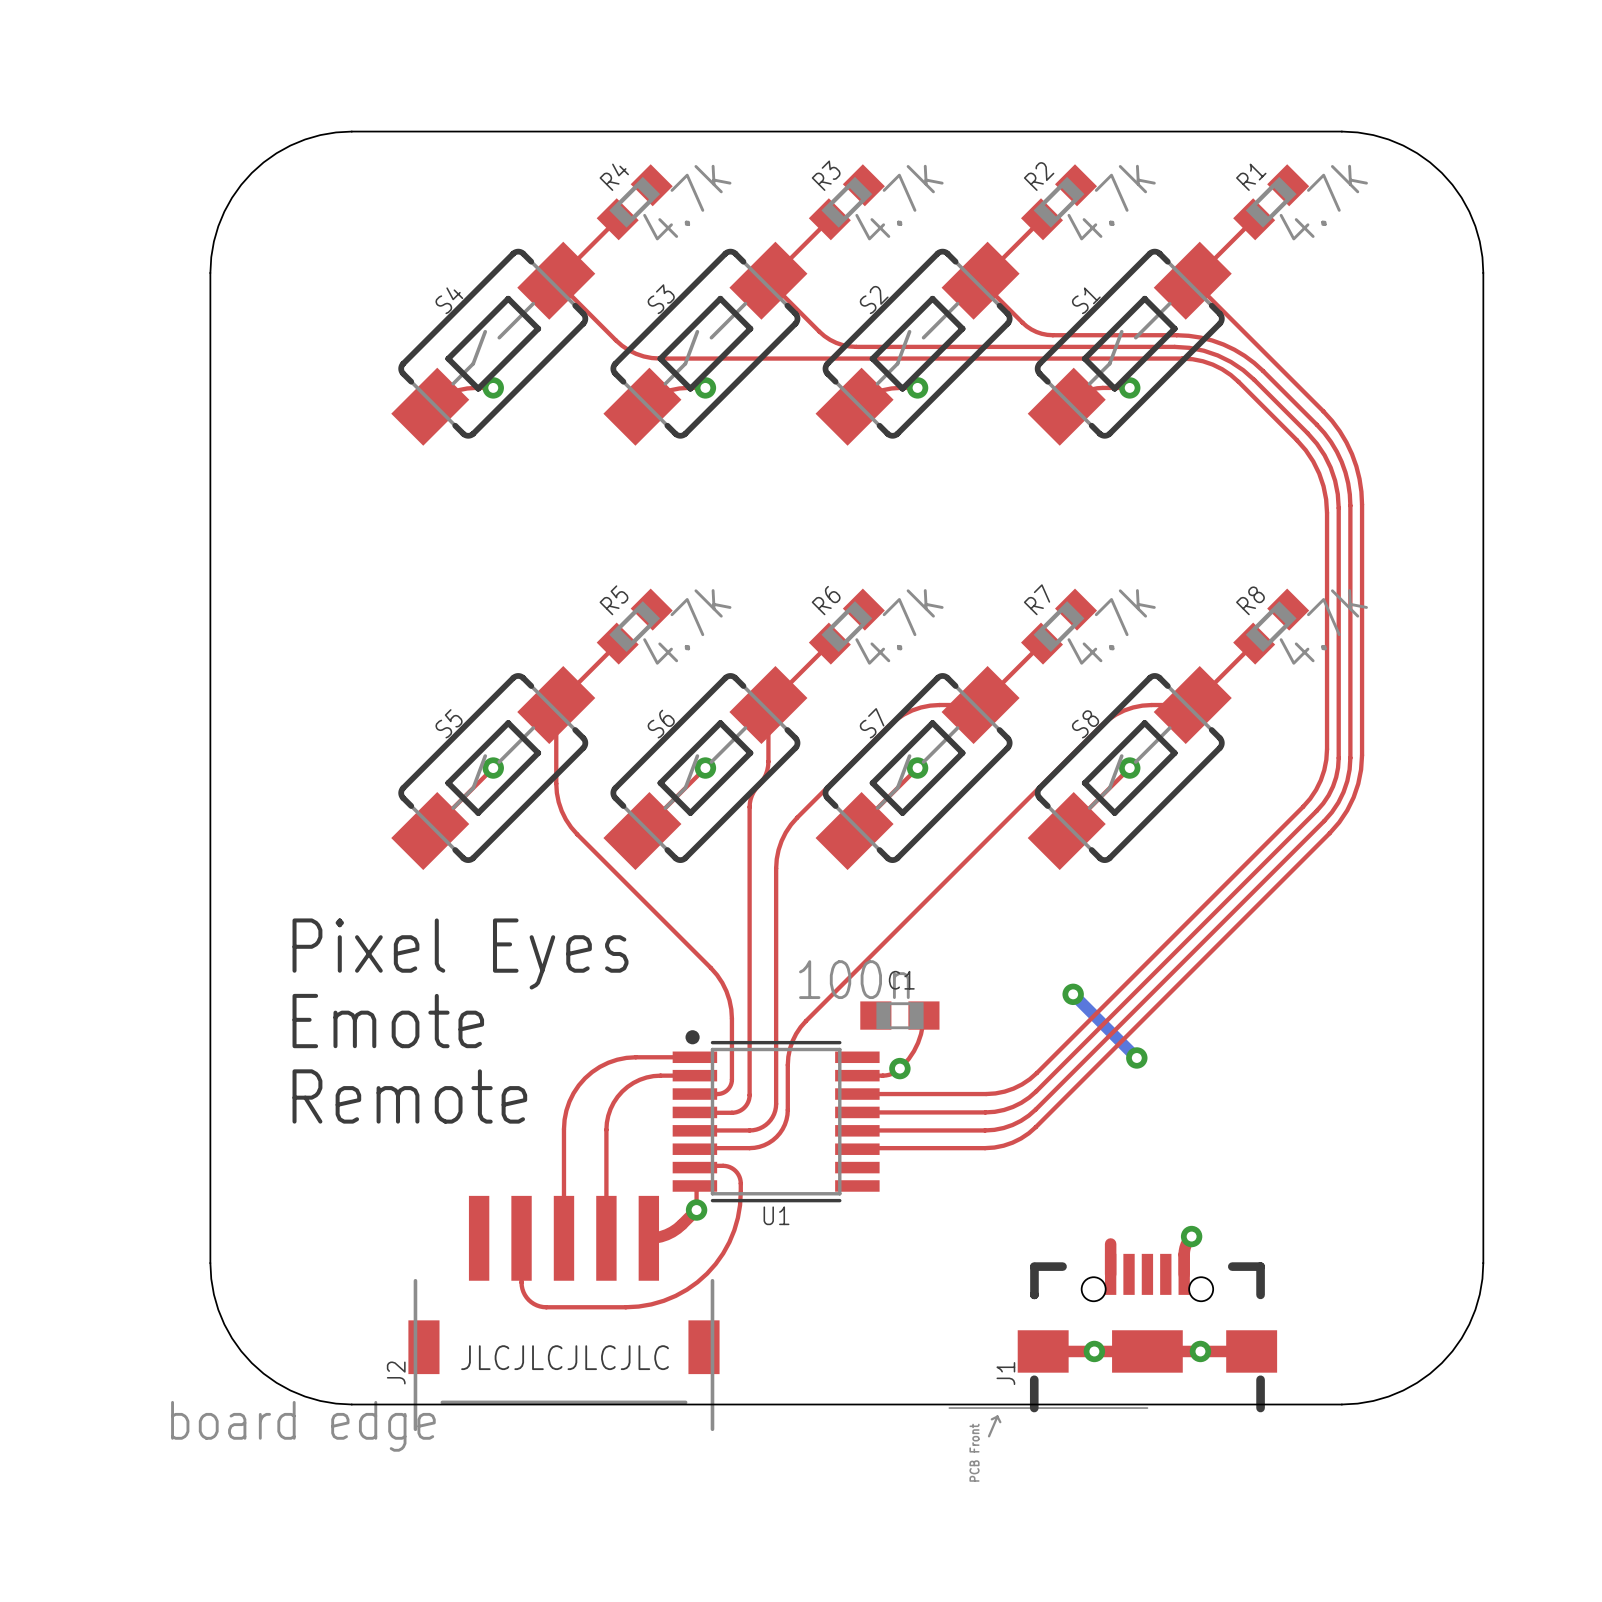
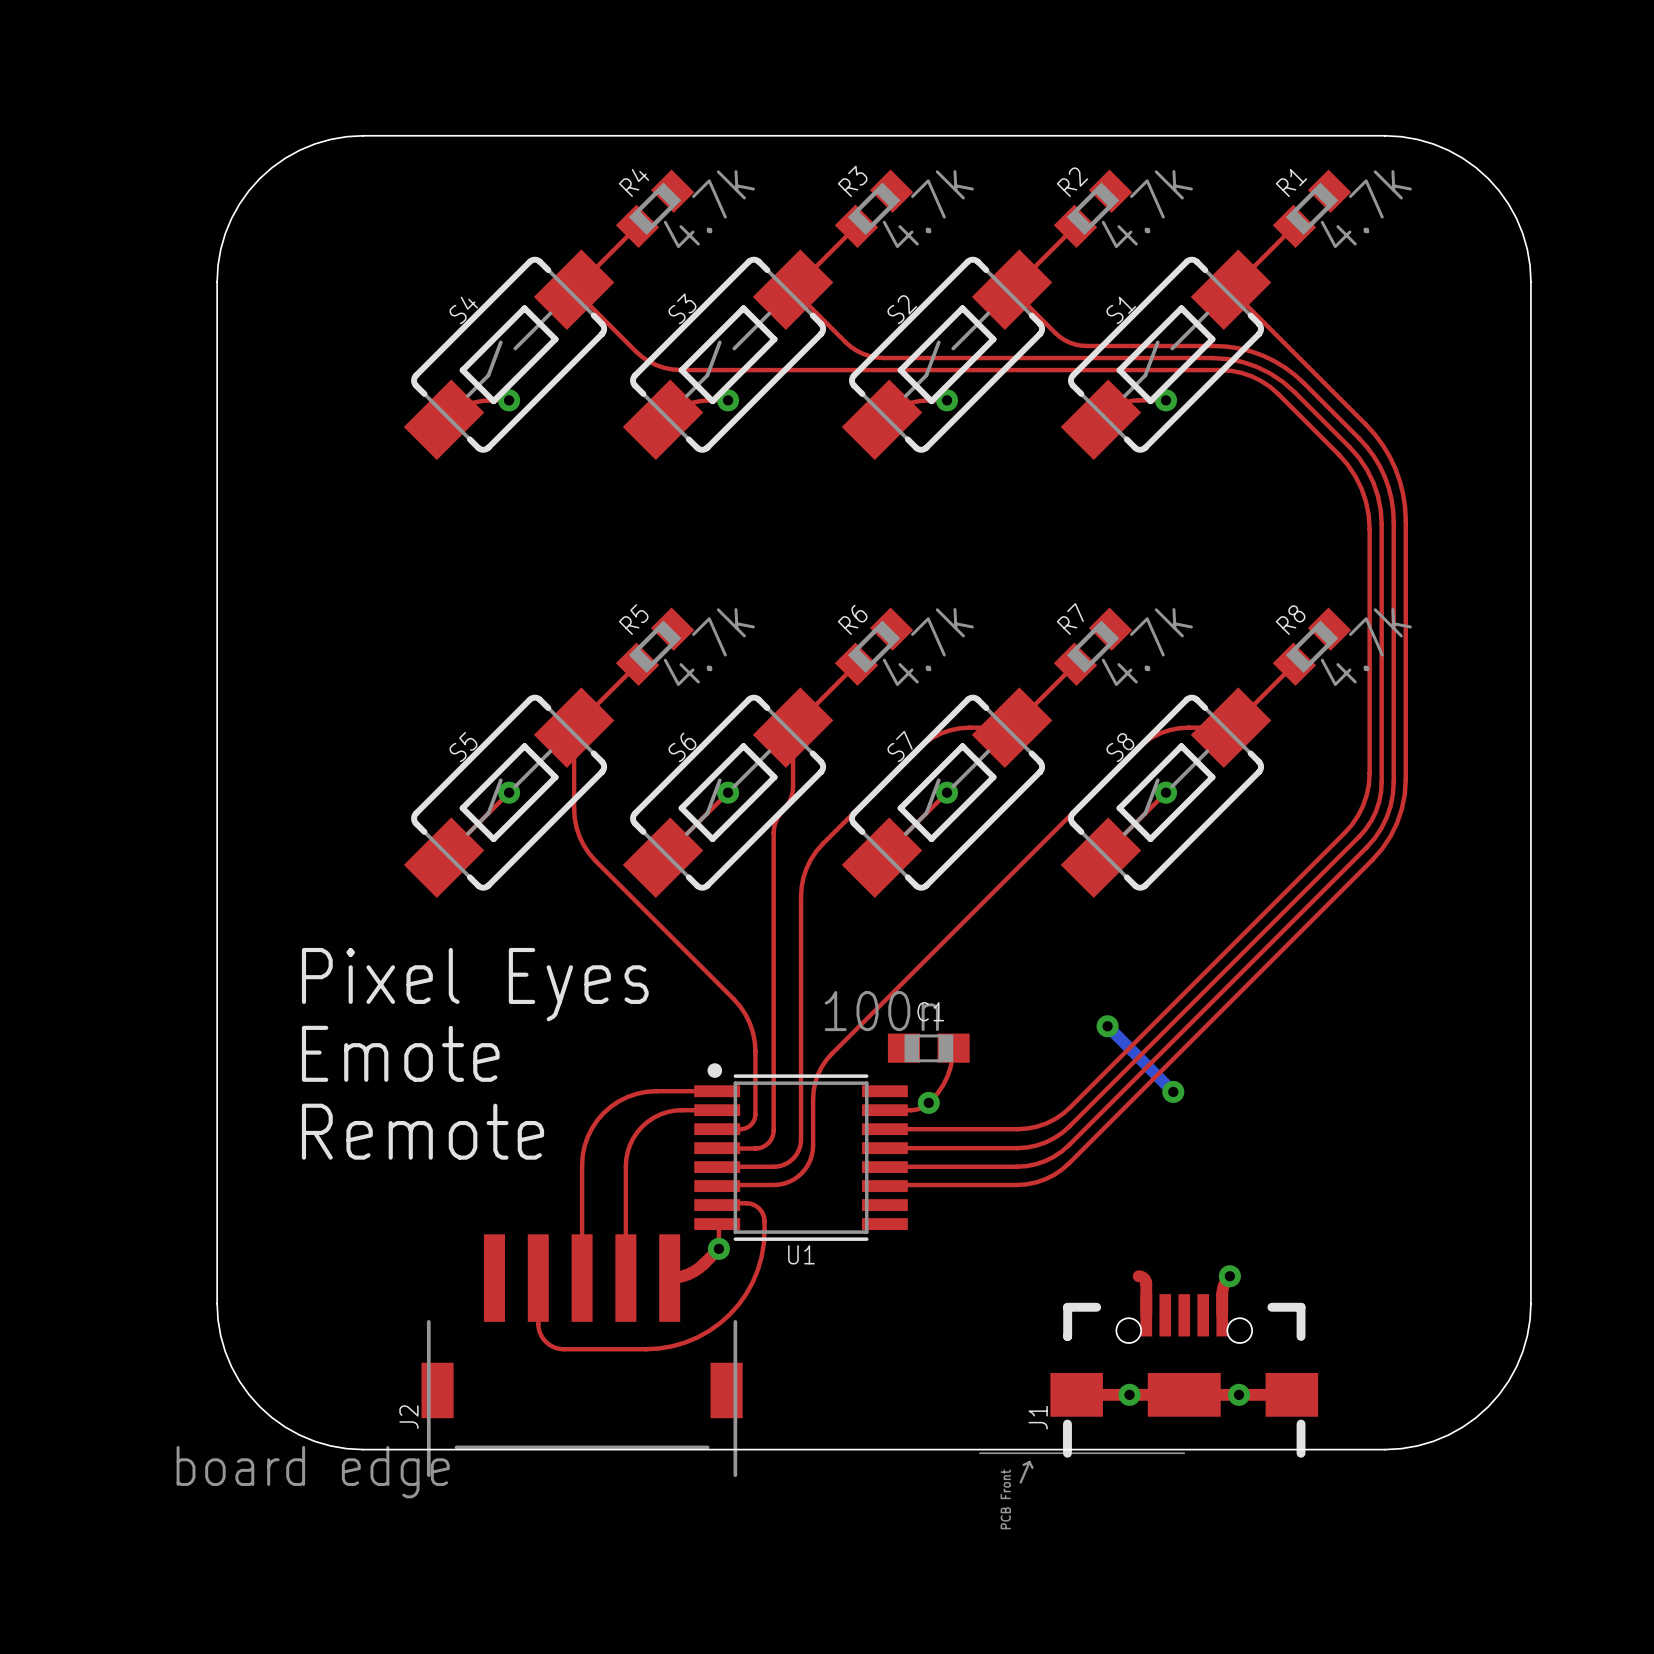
top track: none -> (1138, 1276) (1144, 1278) (1146, 1283)
text: JLCJLCJLCJLC (565, 1357) -> none

